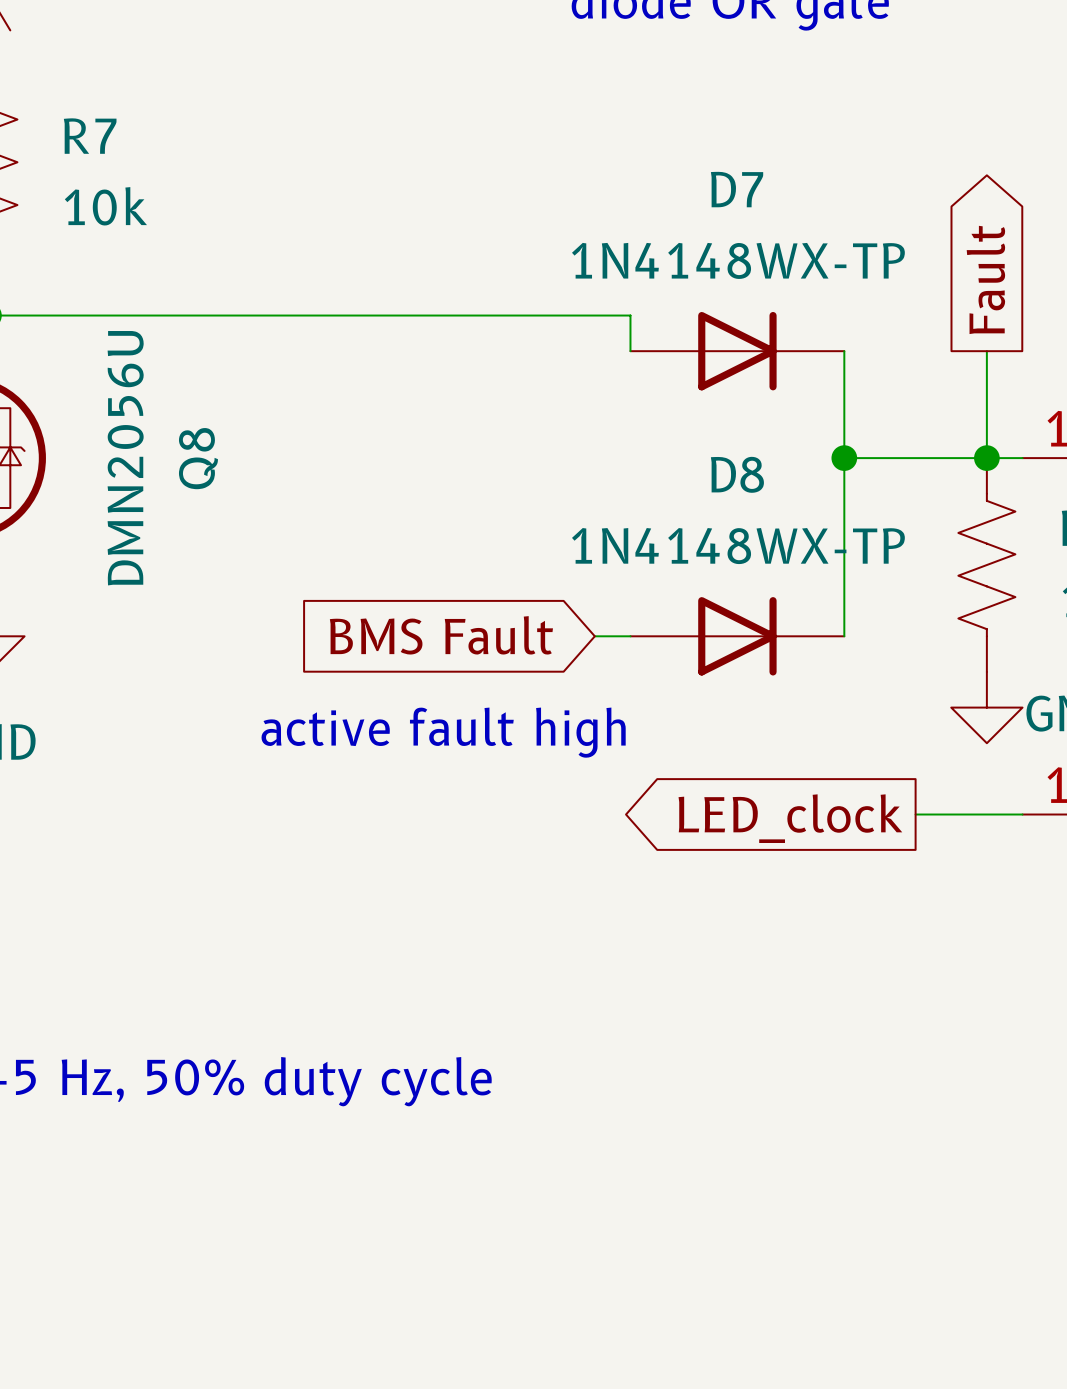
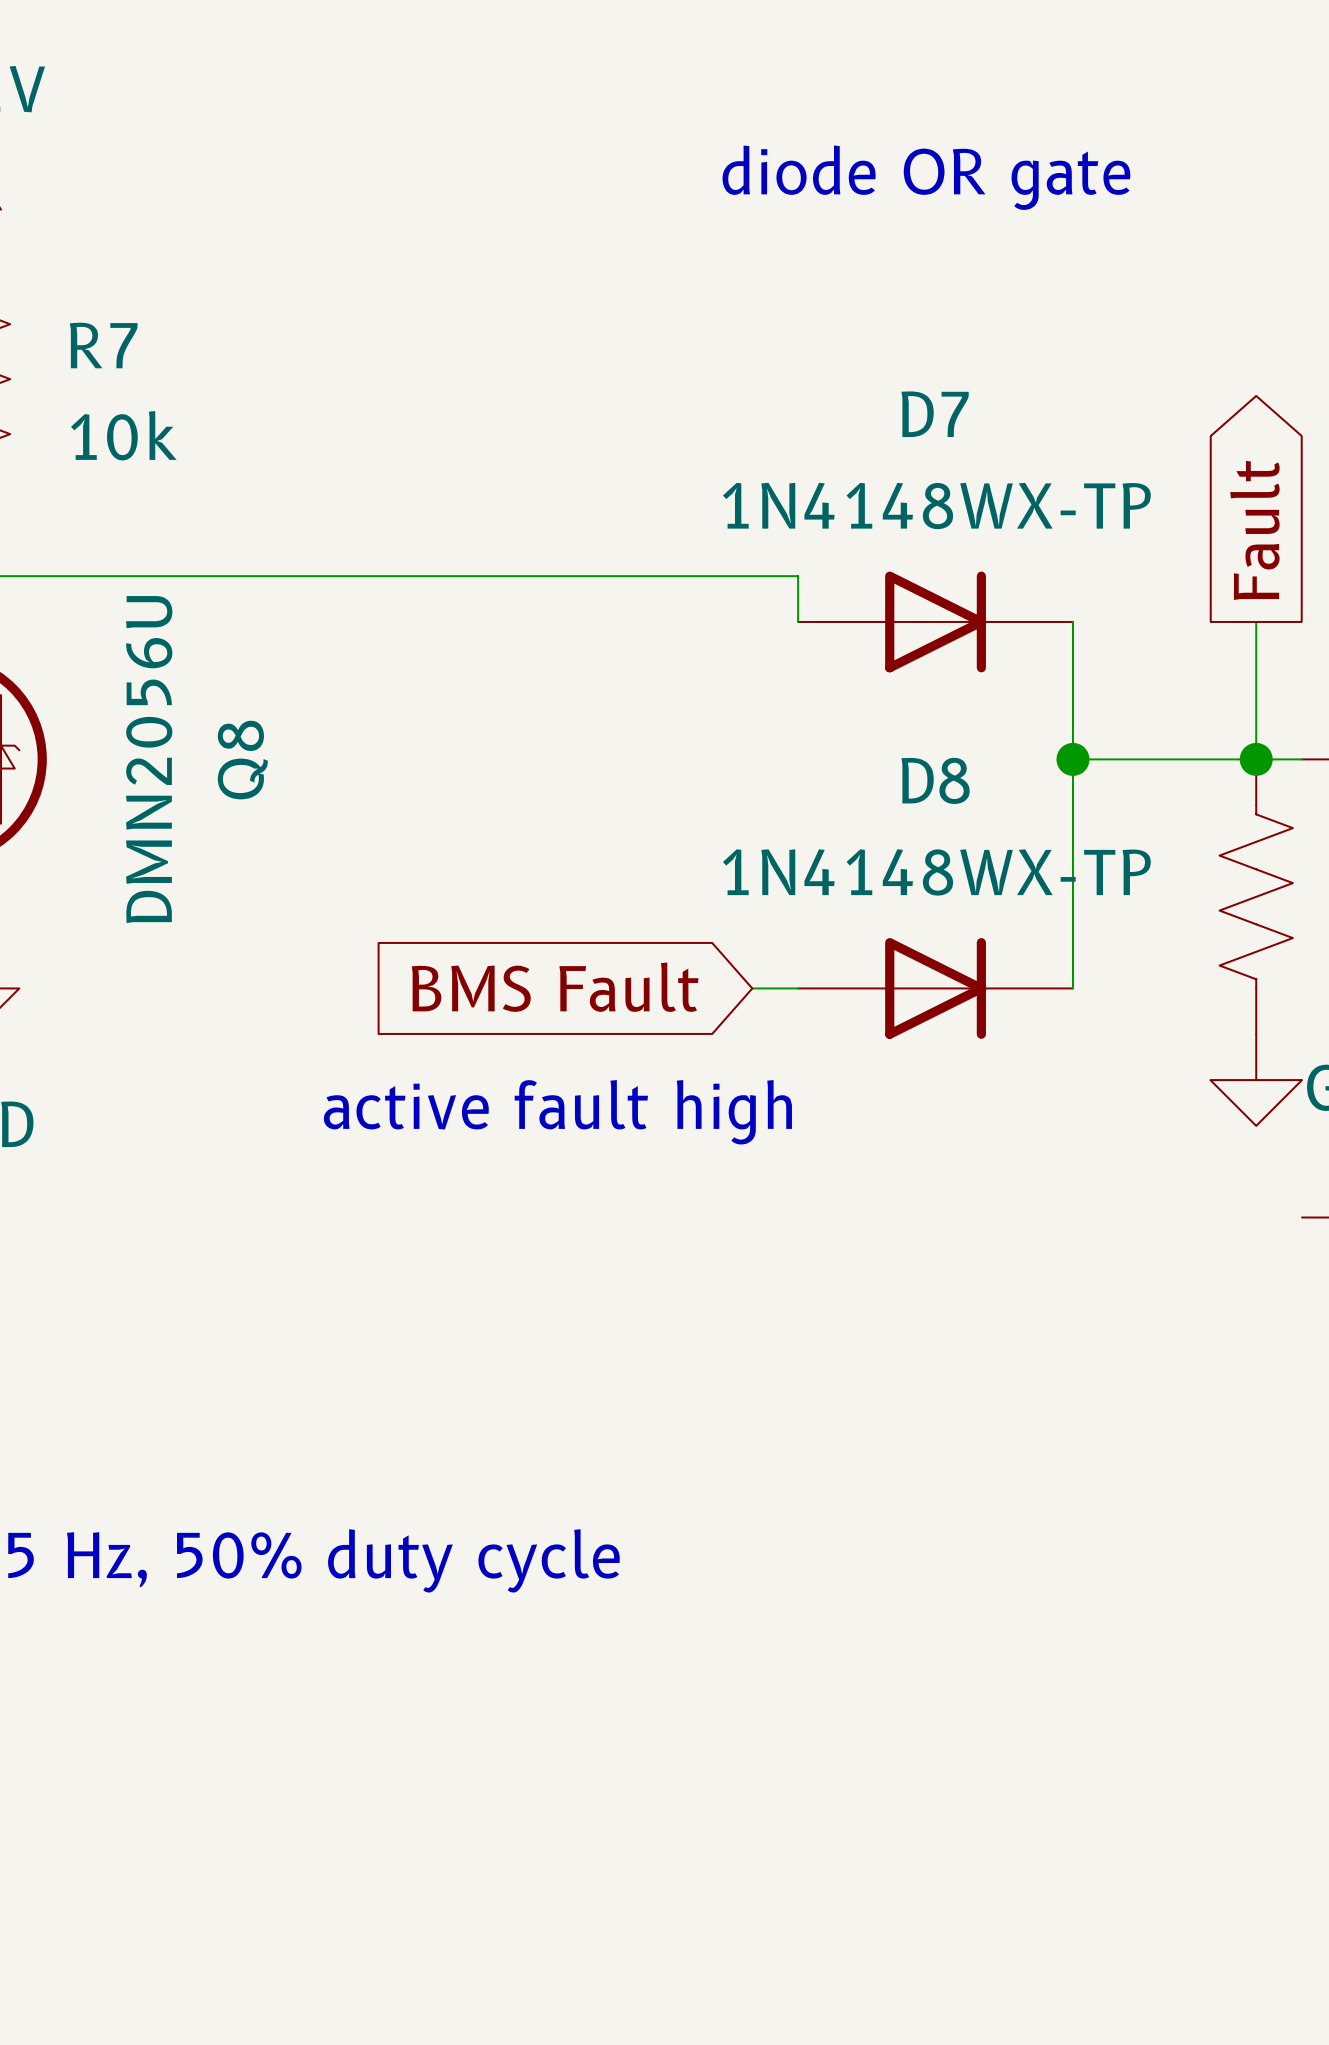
wire: (915, 814) (1022, 814) -> none
global label: LED_clock (790, 818) -> none

